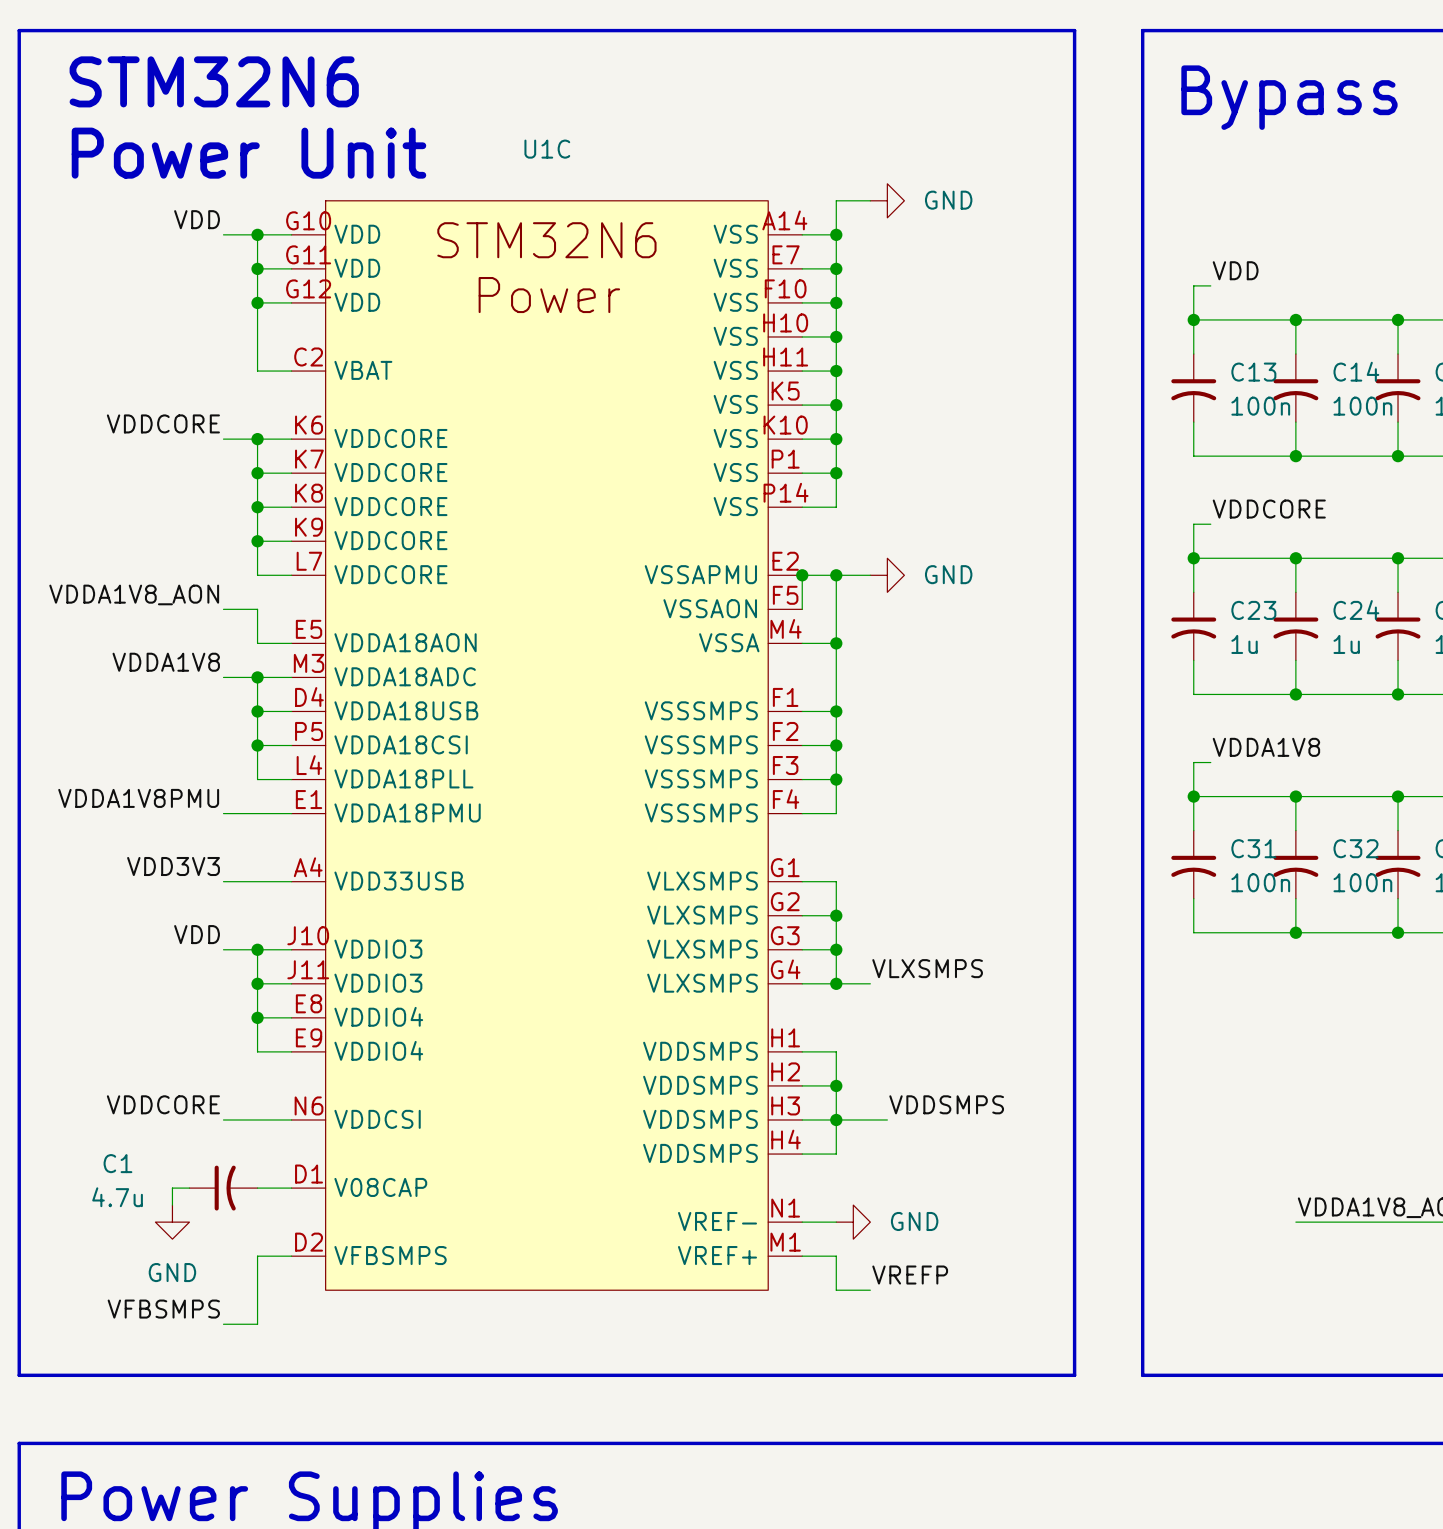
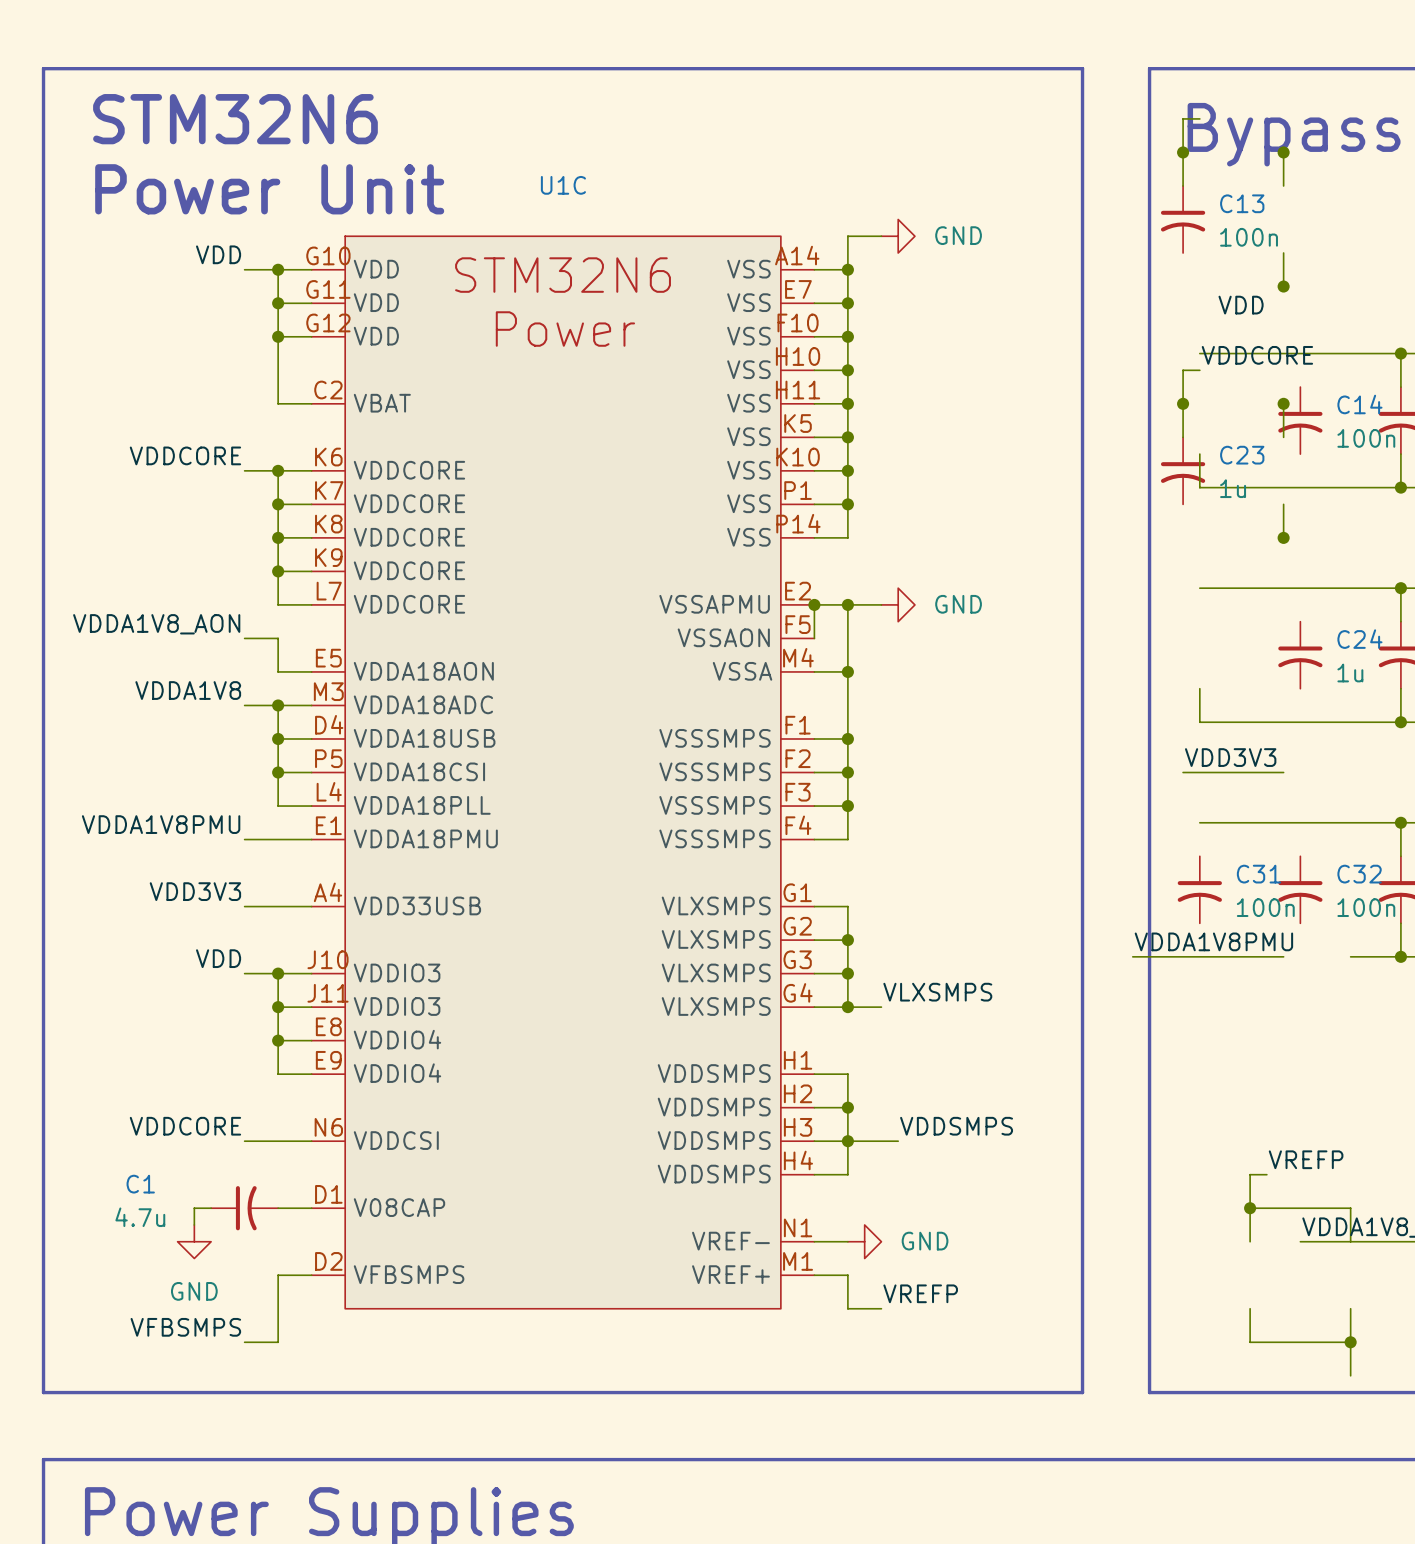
junction: none -> (1183, 152)
junction: none -> (1283, 152)
junction: none -> (1283, 286)
wire: (1210, 285) (1193, 285) (1193, 354) -> (1199, 118) (1183, 118) (1183, 185)
junction: (1193, 319) -> none
wire: (1295, 319) (1295, 354) -> (1283, 152) (1283, 185)
junction: (1295, 319) -> none
junction: none -> (1183, 403)
junction: none -> (1283, 403)
C13 position: (1193, 388) -> (1183, 219)
wire: (1295, 422) (1295, 456) -> (1283, 253) (1283, 286)
junction: (1295, 456) -> none
junction: none -> (1283, 537)
label position: VDDCORE (1269, 509) -> VDDCORE (1257, 355)
wire: (1210, 524) (1193, 524) (1193, 592) -> (1199, 370) (1183, 370) (1183, 437)
junction: (1193, 558) -> none
wire: (1295, 558) (1295, 592) -> (1283, 403) (1283, 437)
junction: (1295, 558) -> none
C23 position: (1193, 626) -> (1183, 470)
wire: (1295, 660) (1295, 694) -> (1283, 504) (1283, 537)
junction: (1295, 694) -> none
wire: none -> (1183, 772) (1283, 772)
label: VDDA1V8 (1266, 747) -> VDD3V3 (1230, 757)
wire: (1210, 762) (1193, 762) (1193, 830) -> none
junction: (1193, 796) -> none
wire: (1295, 796) (1295, 830) -> none
junction: (1295, 796) -> none
wire: (1193, 898) (1193, 932) -> (1132, 956) (1199, 956)
wire: (1295, 898) (1295, 932) -> none
label: none -> VDDA1V8PMU (1213, 941)
wire: (1278, 932) (1346, 932) -> none
junction: (1295, 932) -> none
label: none -> VREFP (1306, 1159)
wire: none -> (1266, 1174) (1250, 1174) (1250, 1241)
wire: none -> (1250, 1208) (1350, 1208) (1350, 1241)
junction: none -> (1250, 1208)
wire: none -> (1250, 1308) (1250, 1342) (1350, 1342)
wire: none -> (1350, 1308) (1350, 1375)
junction: none -> (1350, 1342)

